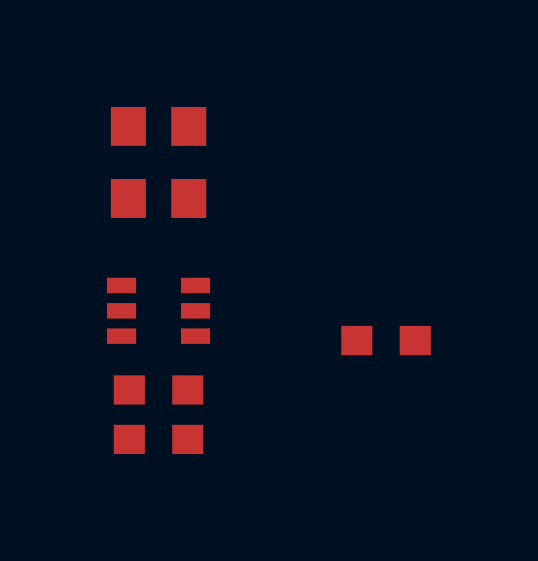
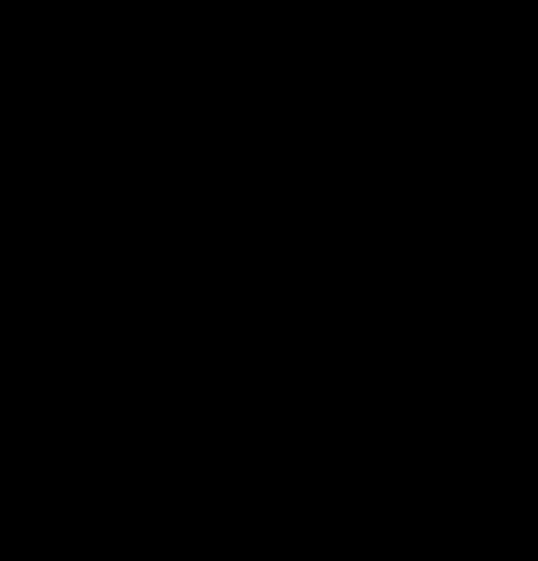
part: (158, 162) -> none
part: (158, 310) -> none
part: (386, 340) -> none
part: (158, 389) -> none
part: (158, 439) -> none

